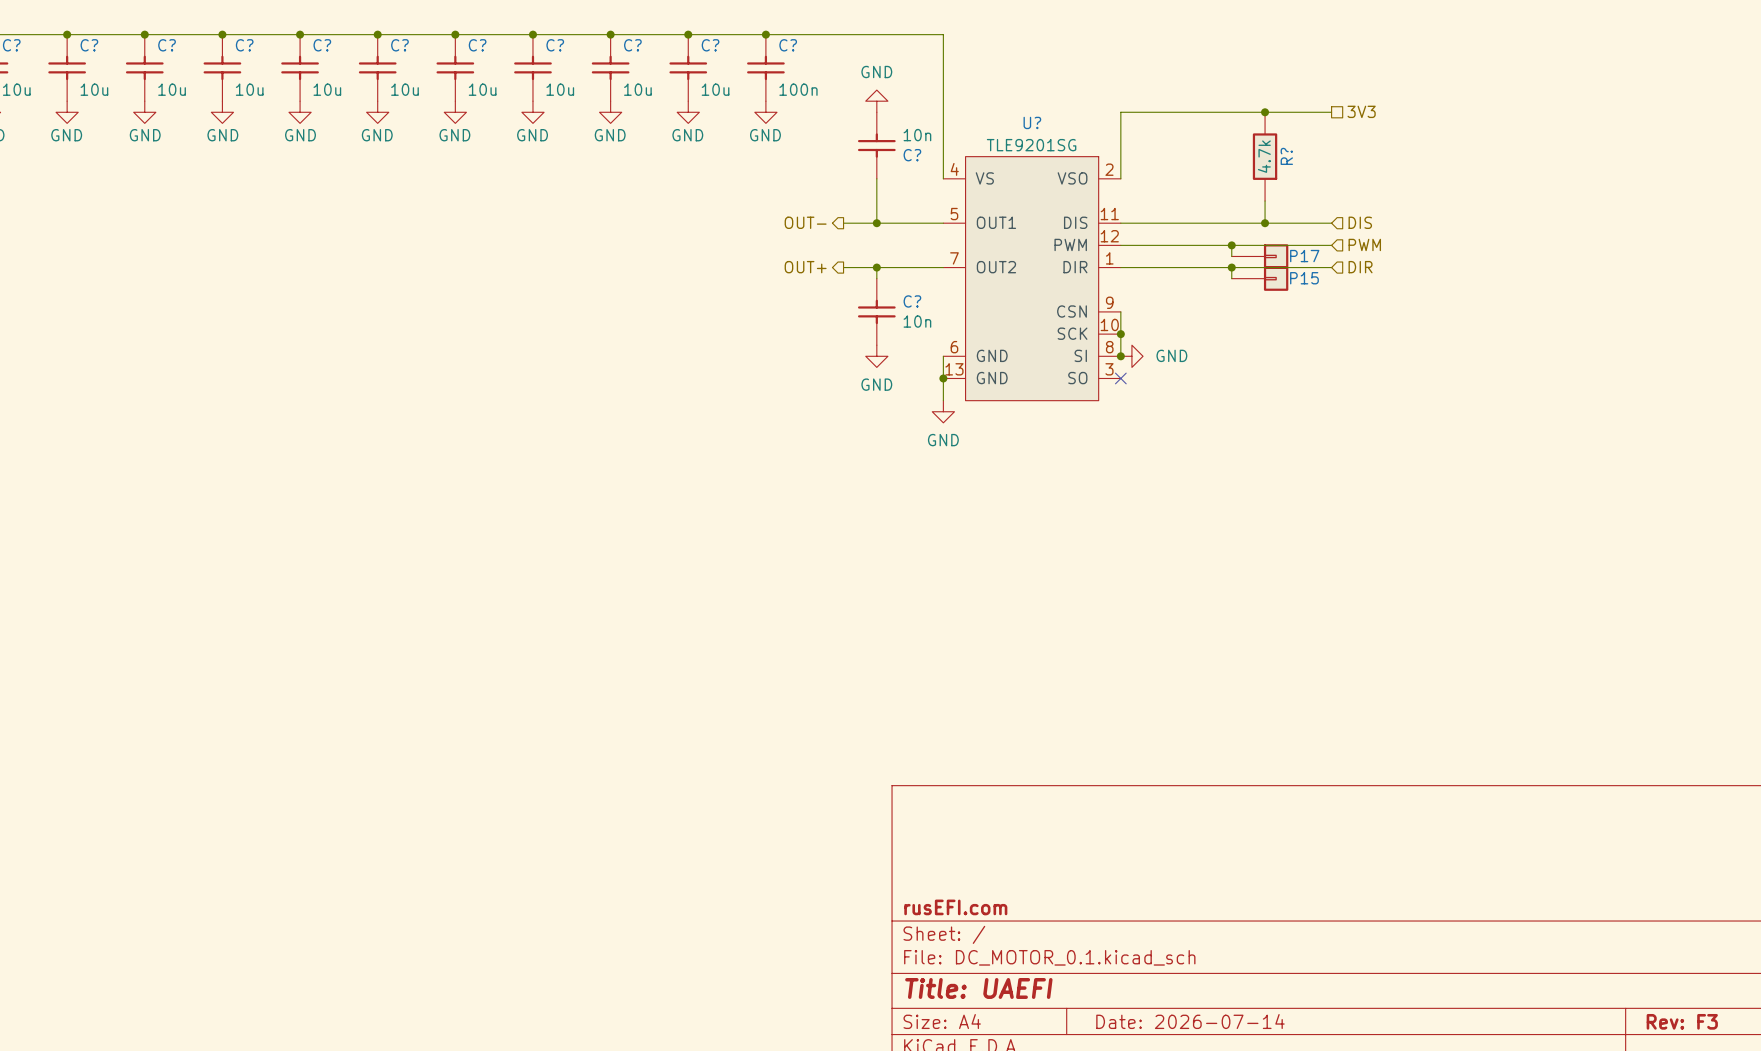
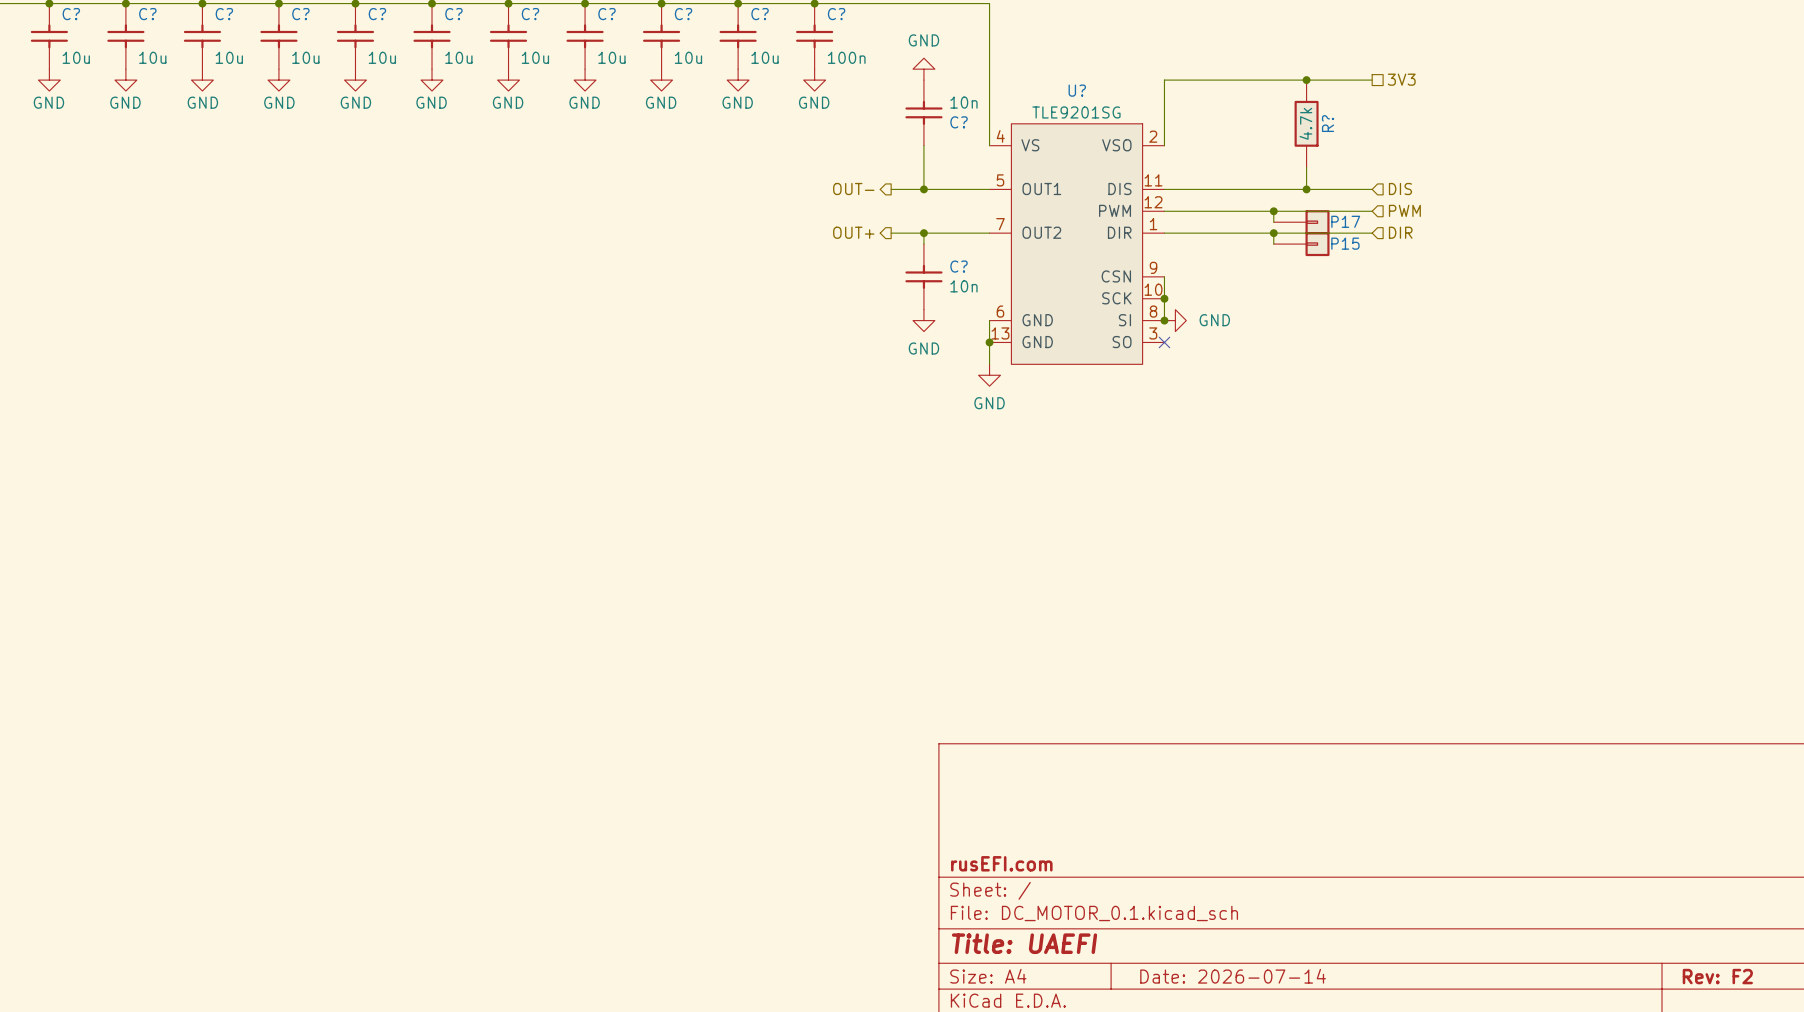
title block: Rev: F3 (1682, 1021) -> Rev: F2 (1717, 976)

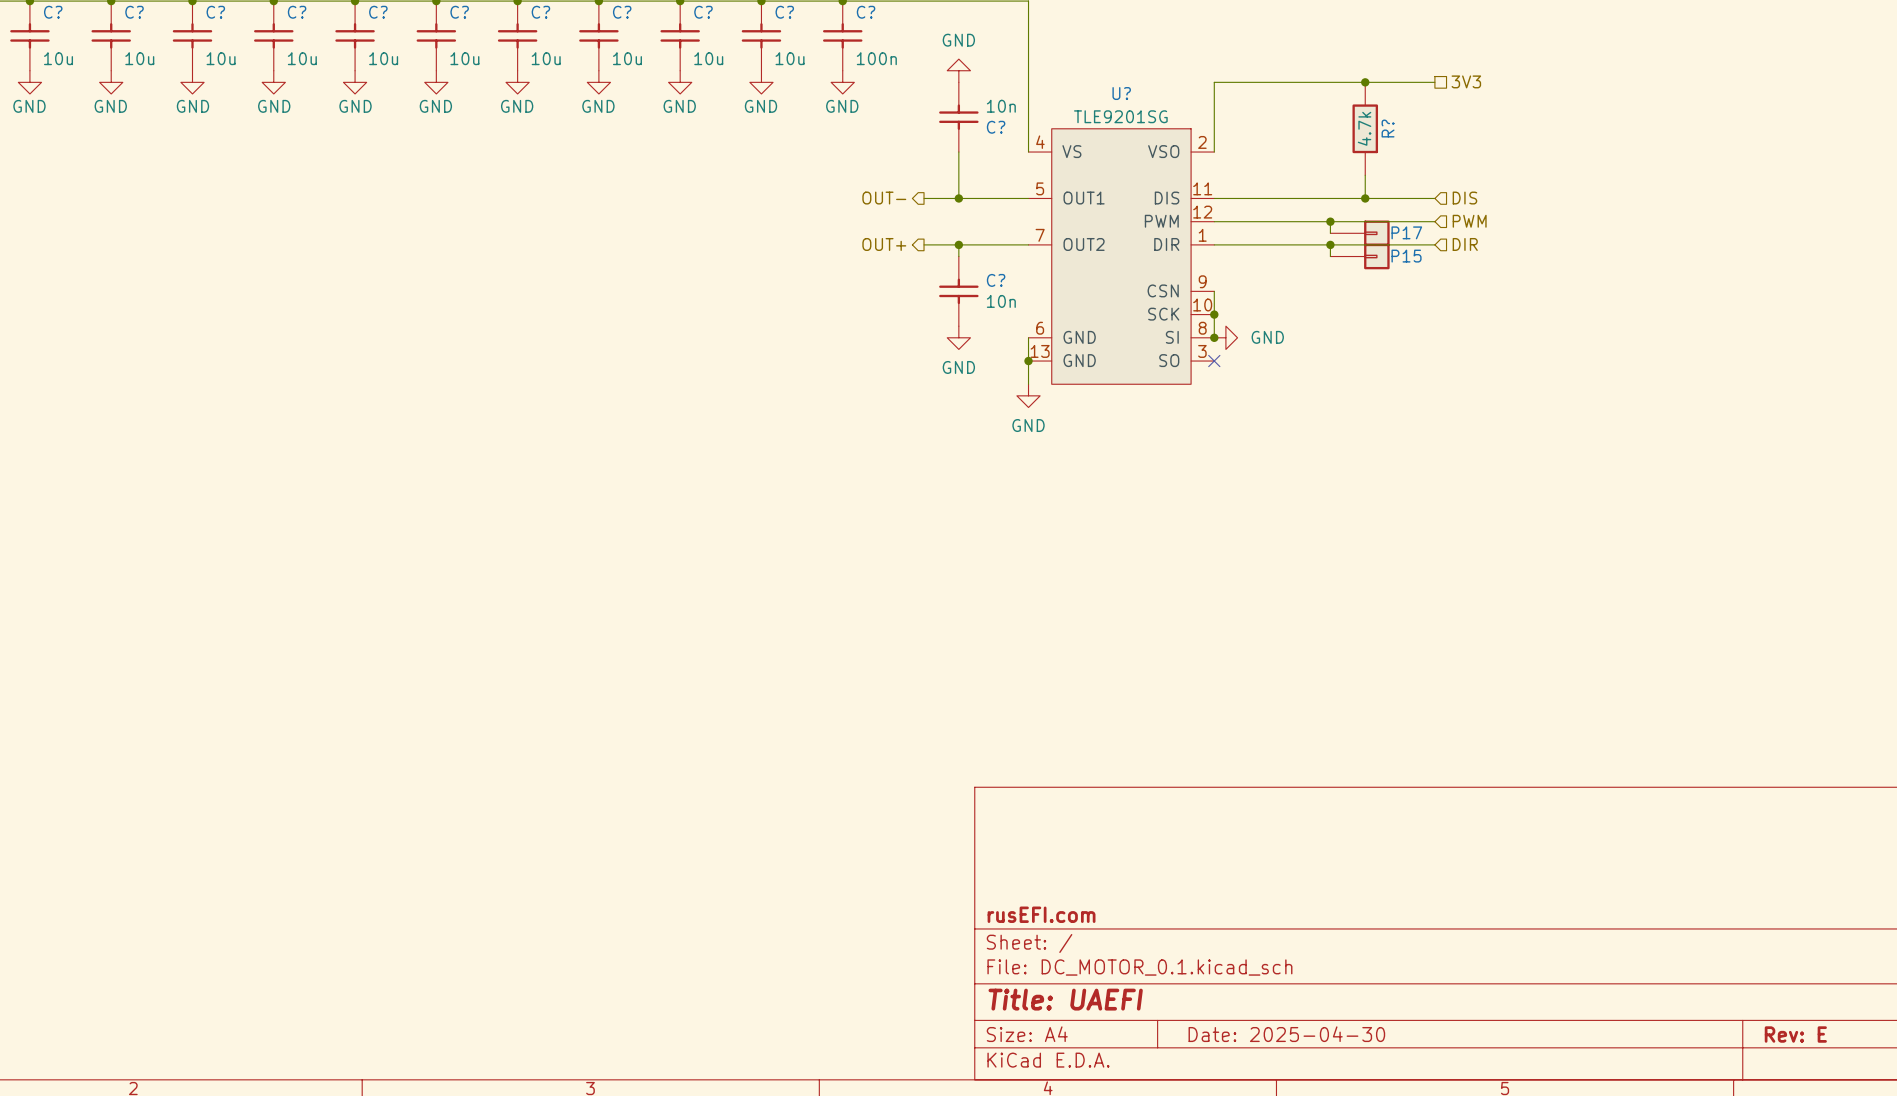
title block: Date: 2026-07-14 (1233, 976) -> Date: 2025-04-30 (1286, 1034)
title block: Rev: F2 (1717, 976) -> Rev: E (1795, 1034)

